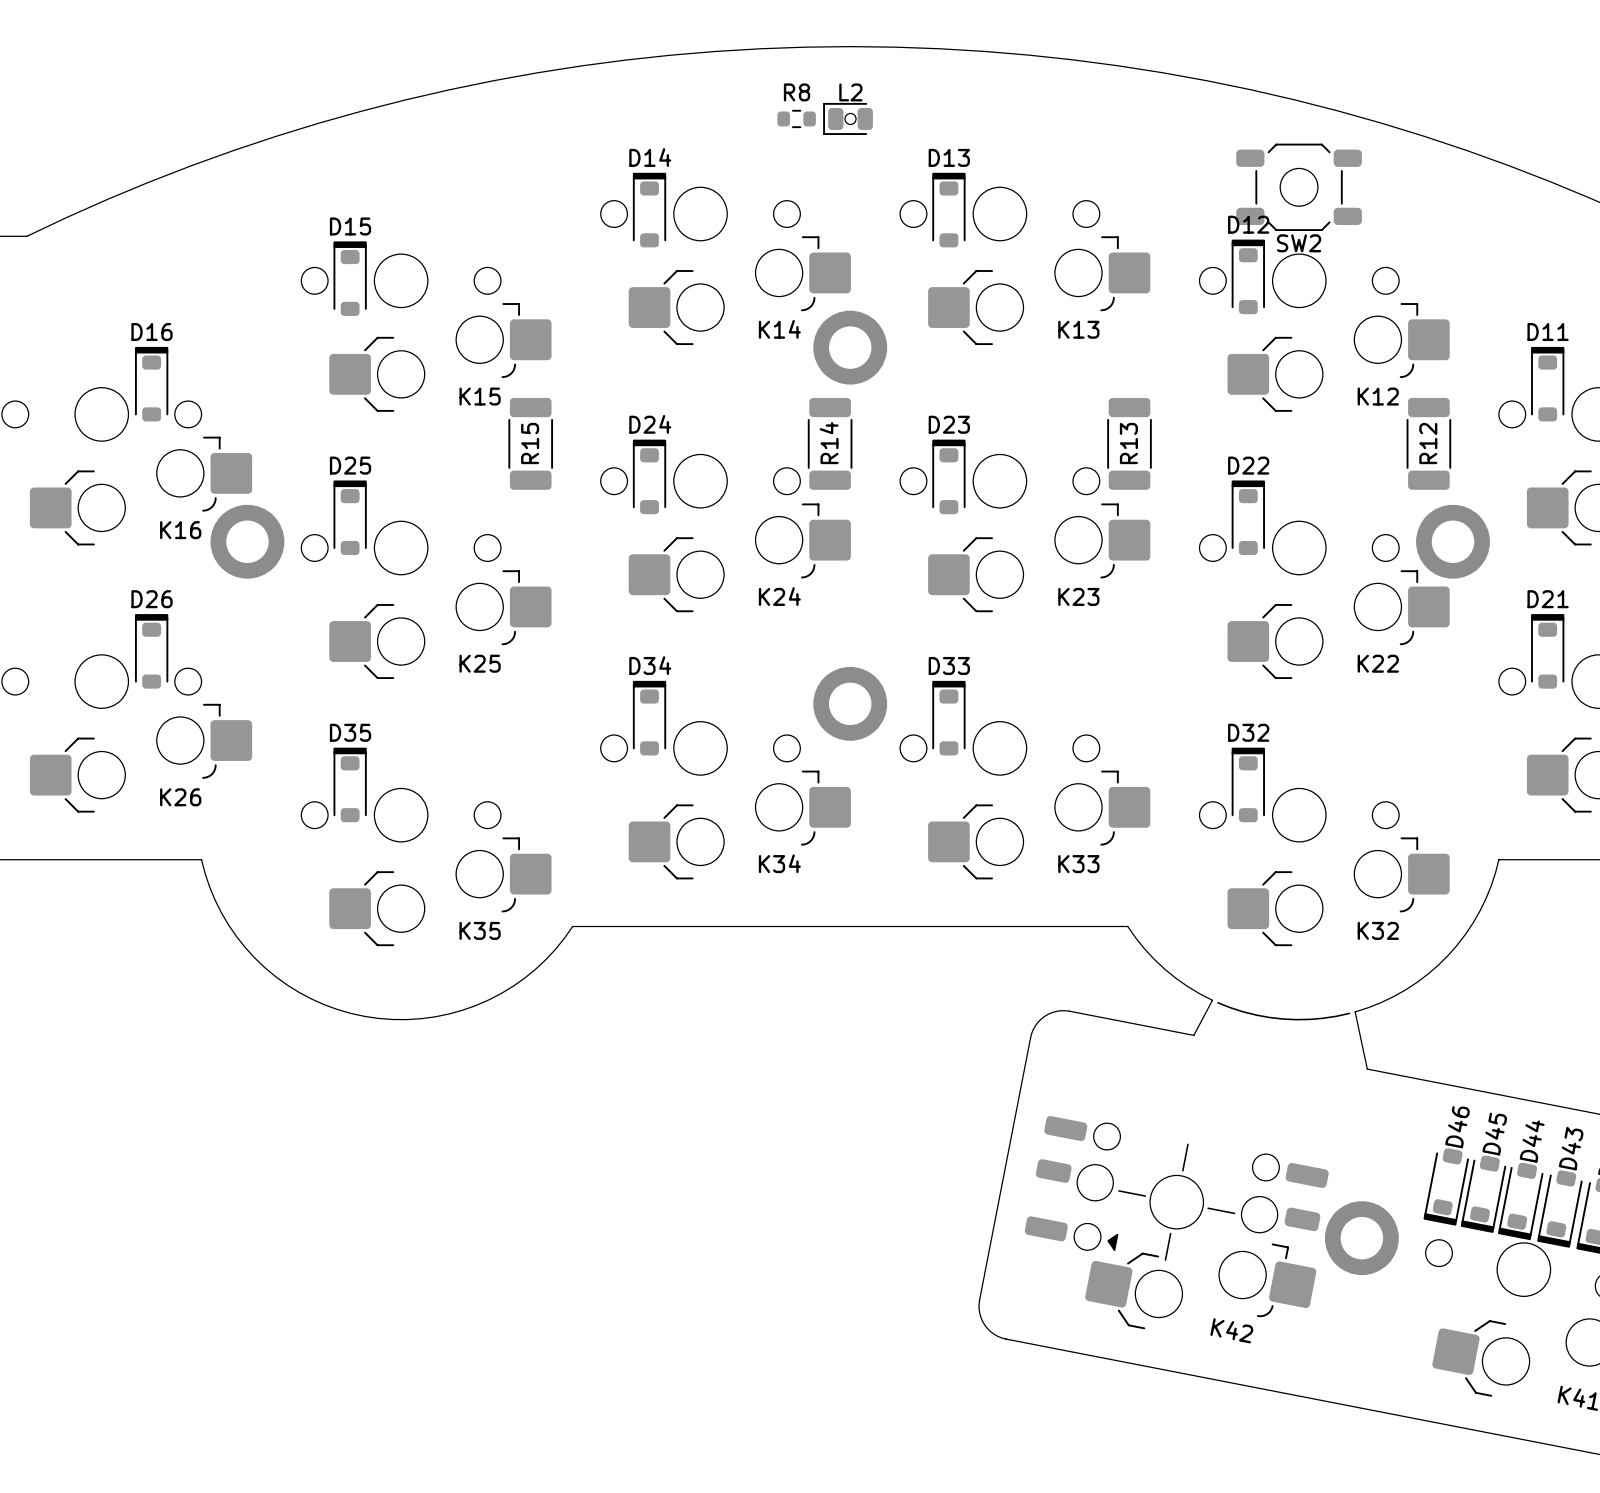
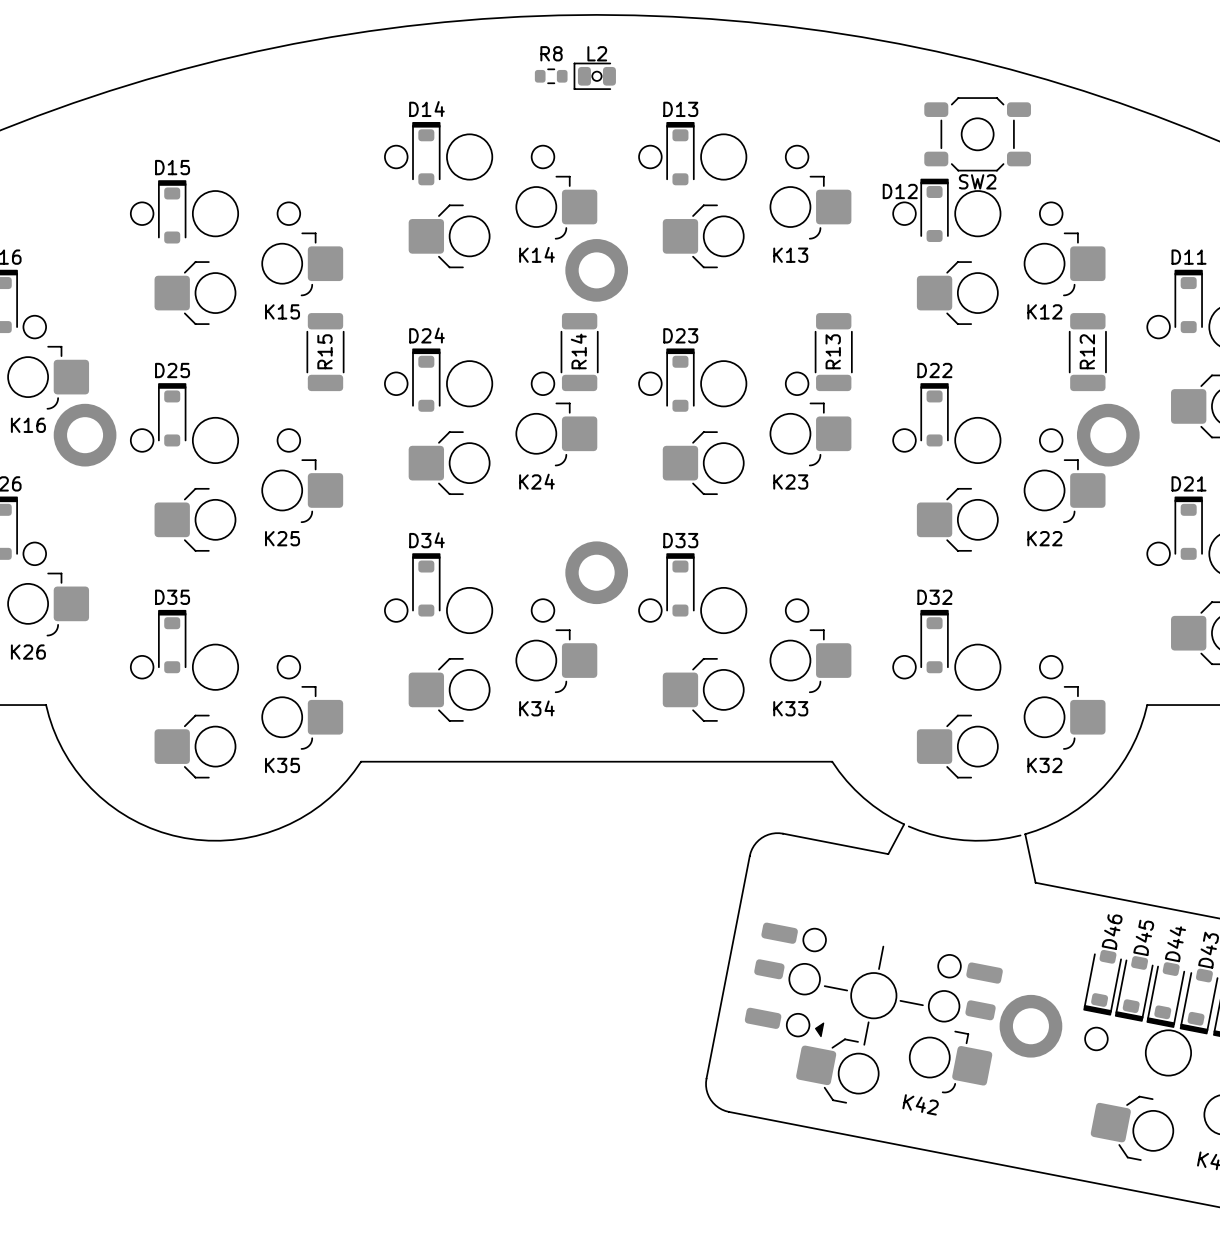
D12 name position: D12 (1248, 224) -> D12 (900, 191)

